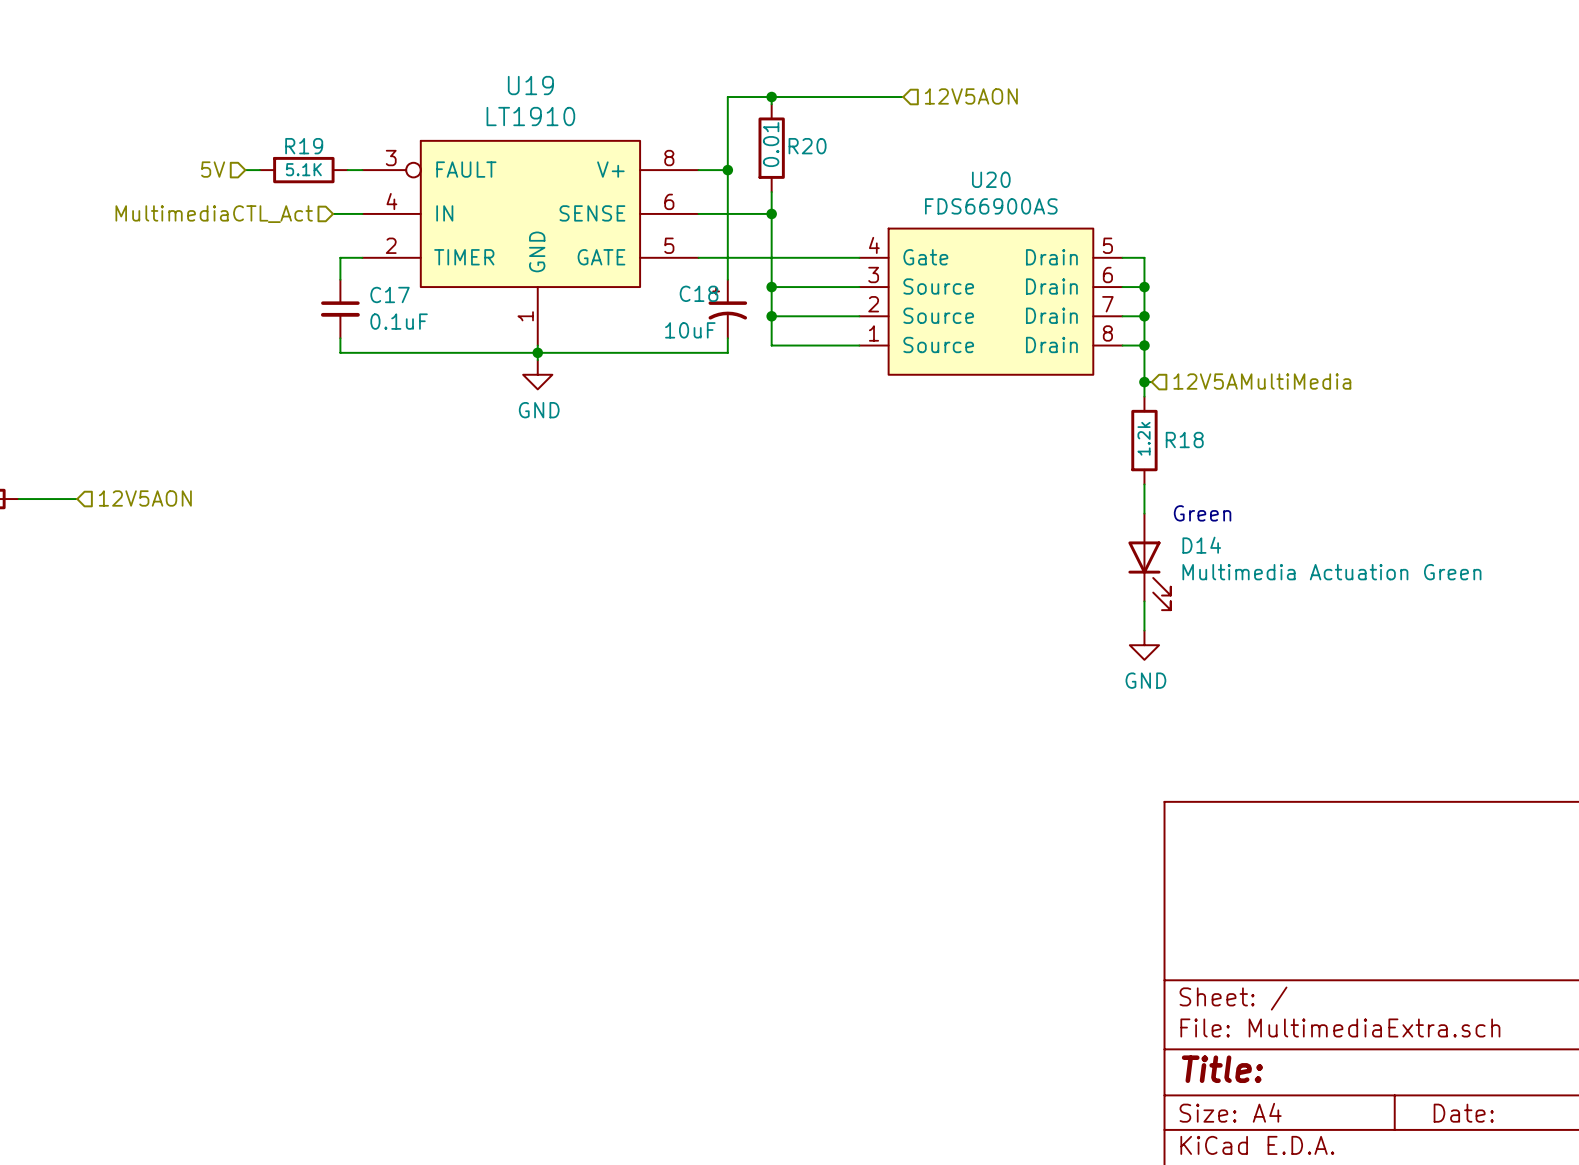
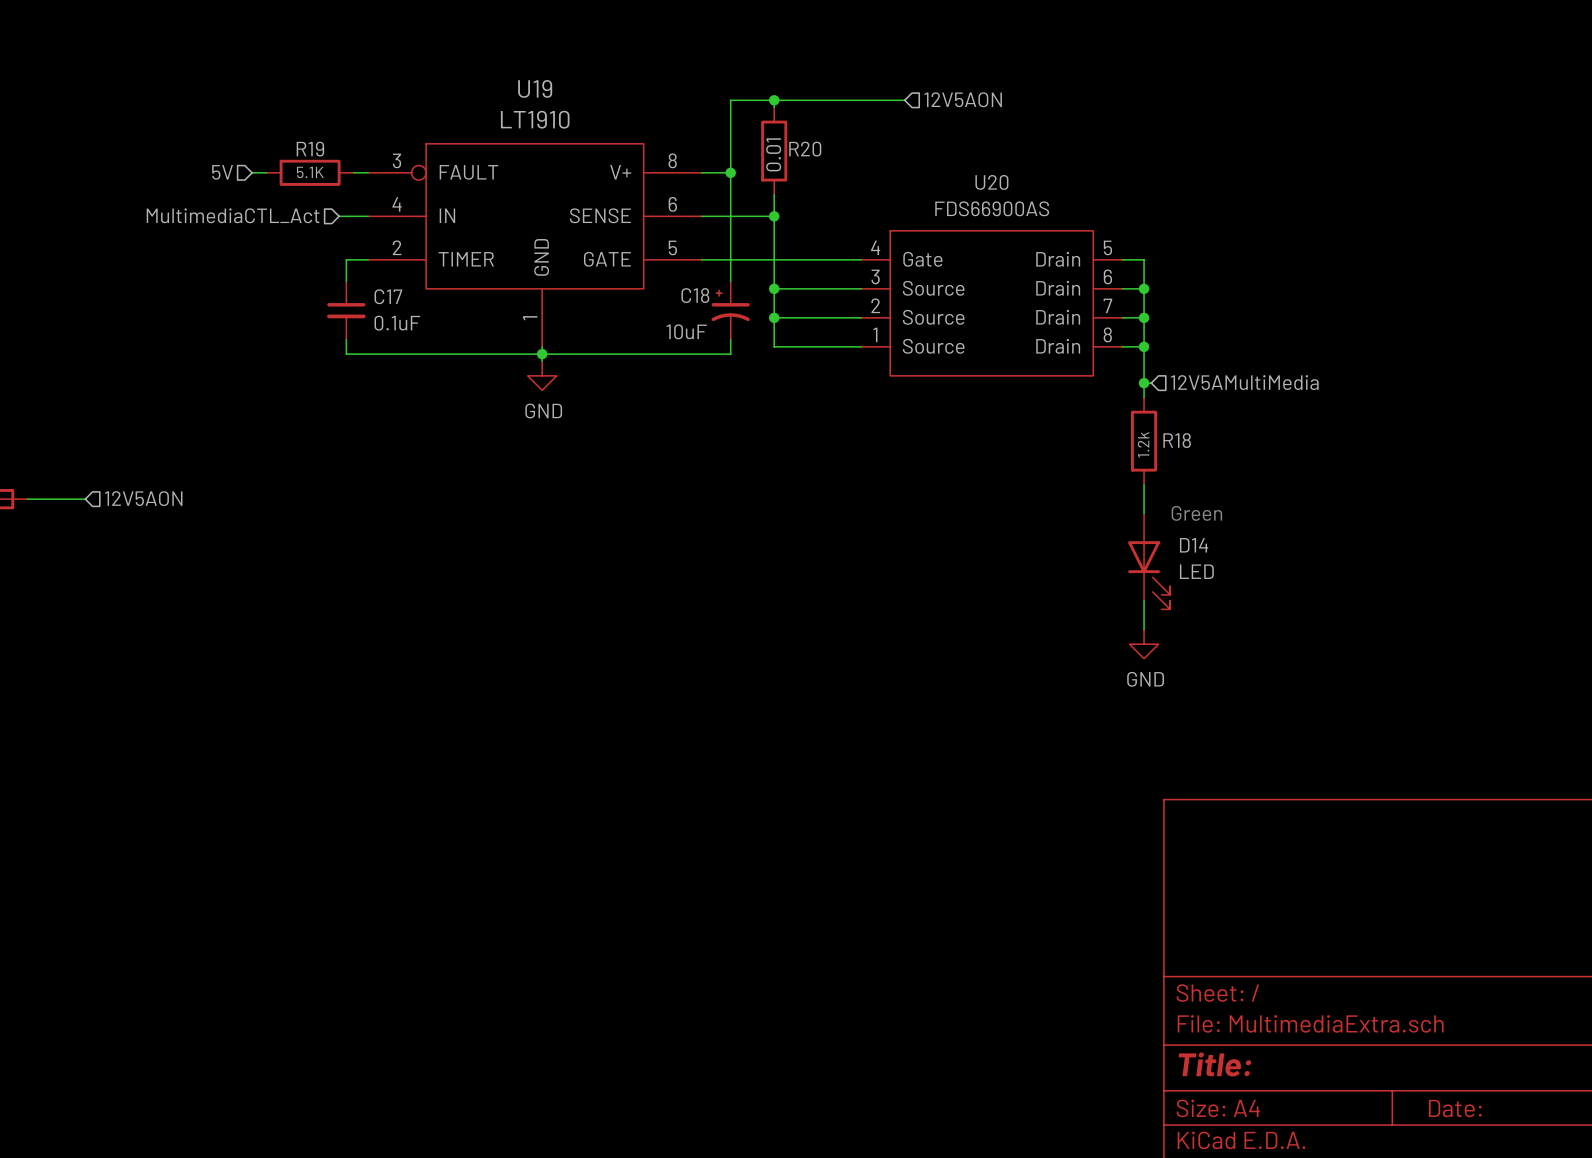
D14 value: Multimedia Actuation Green (1331, 572) -> LED (1196, 571)

